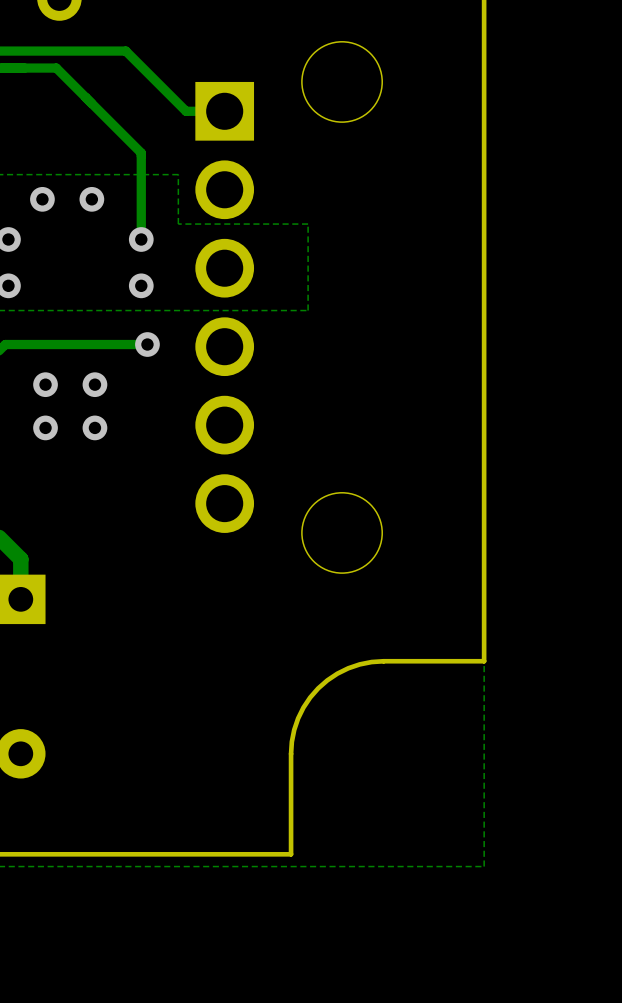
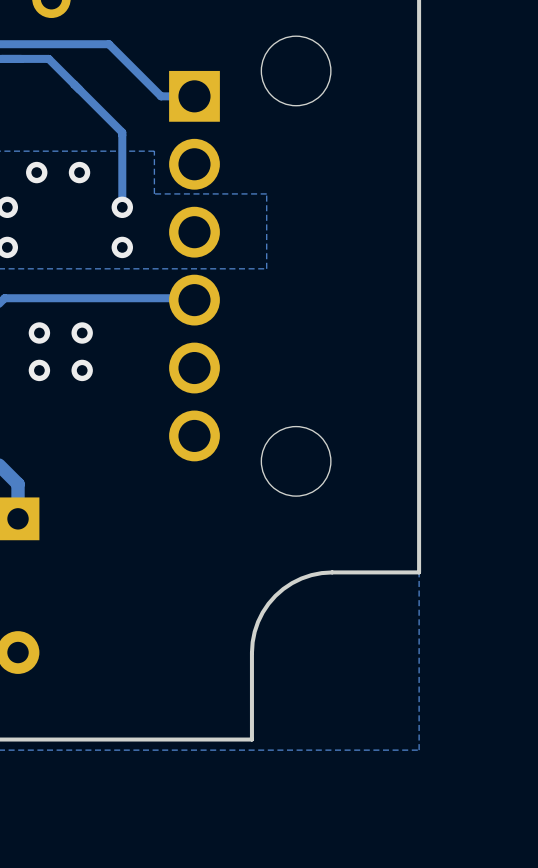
track: none -> (127, 298) (194, 298) (194, 300)
via: (147, 344) -> none

